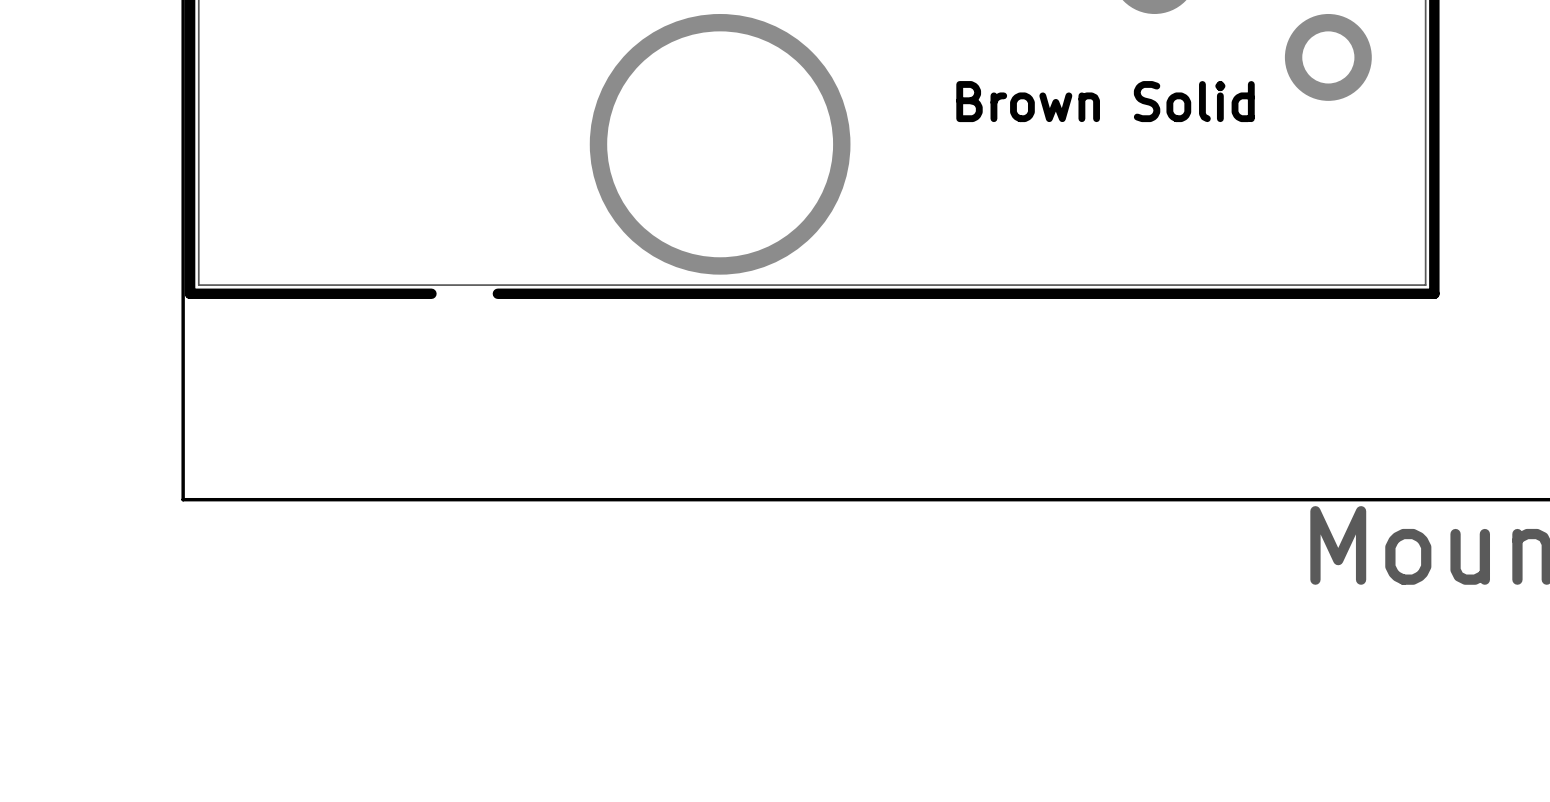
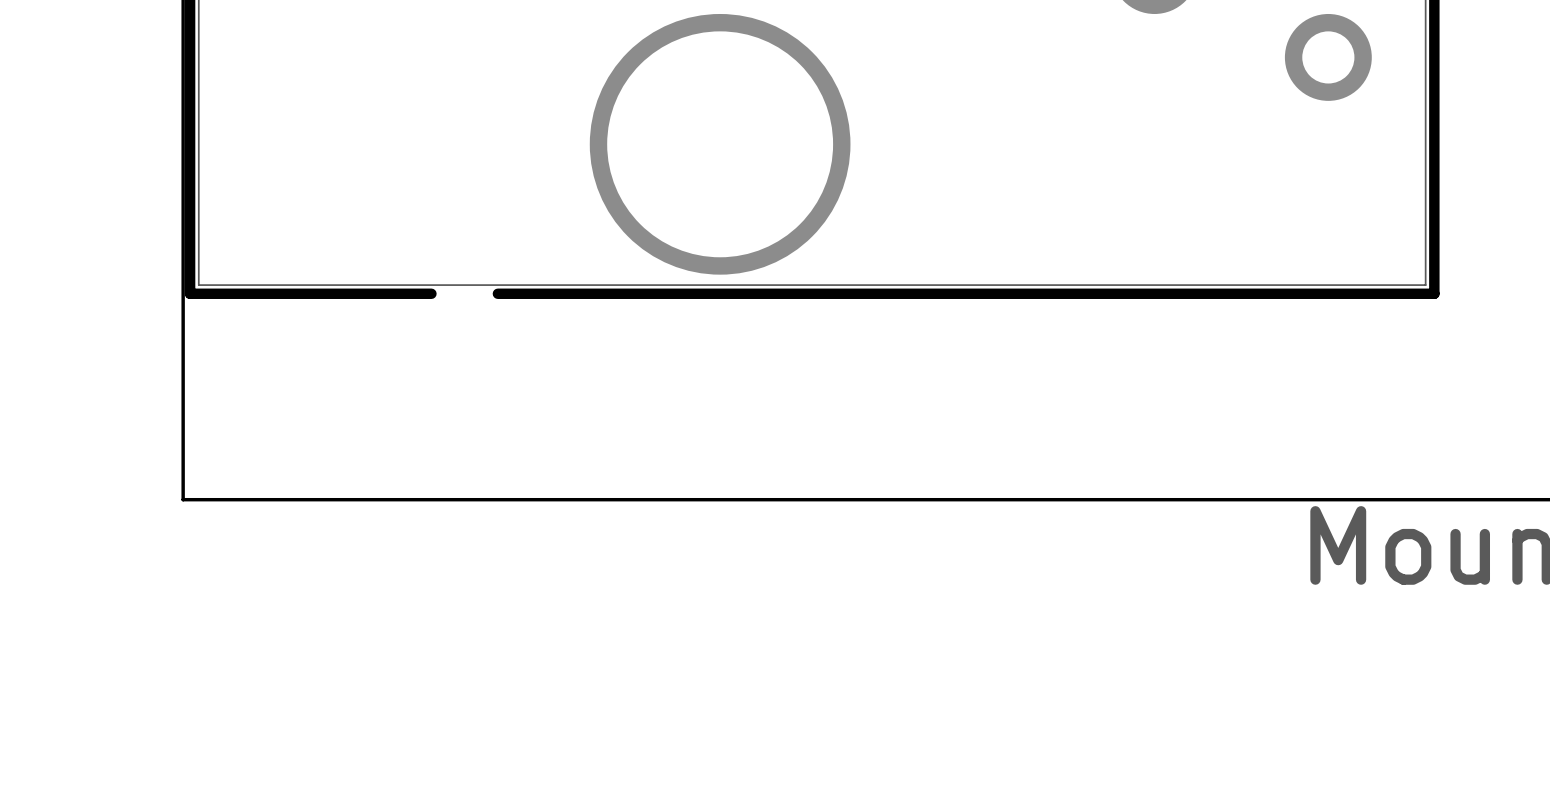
text: Brown Solid (1105, 101) -> none

